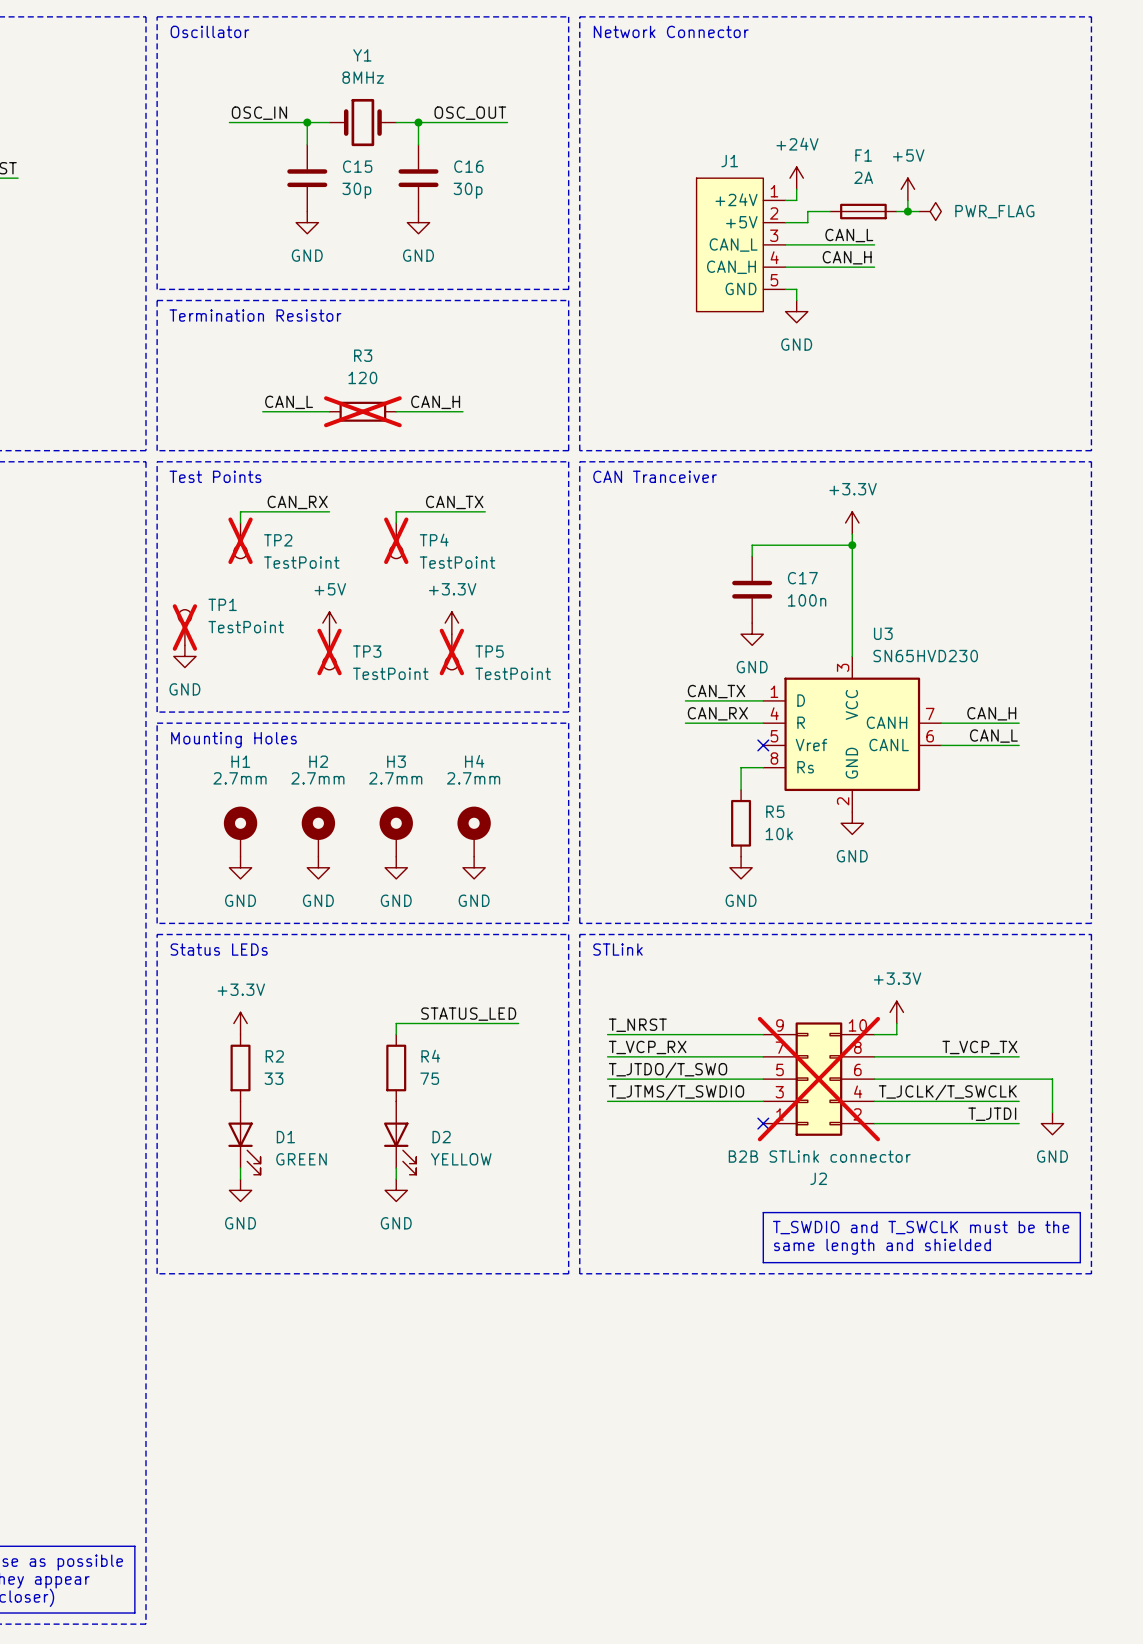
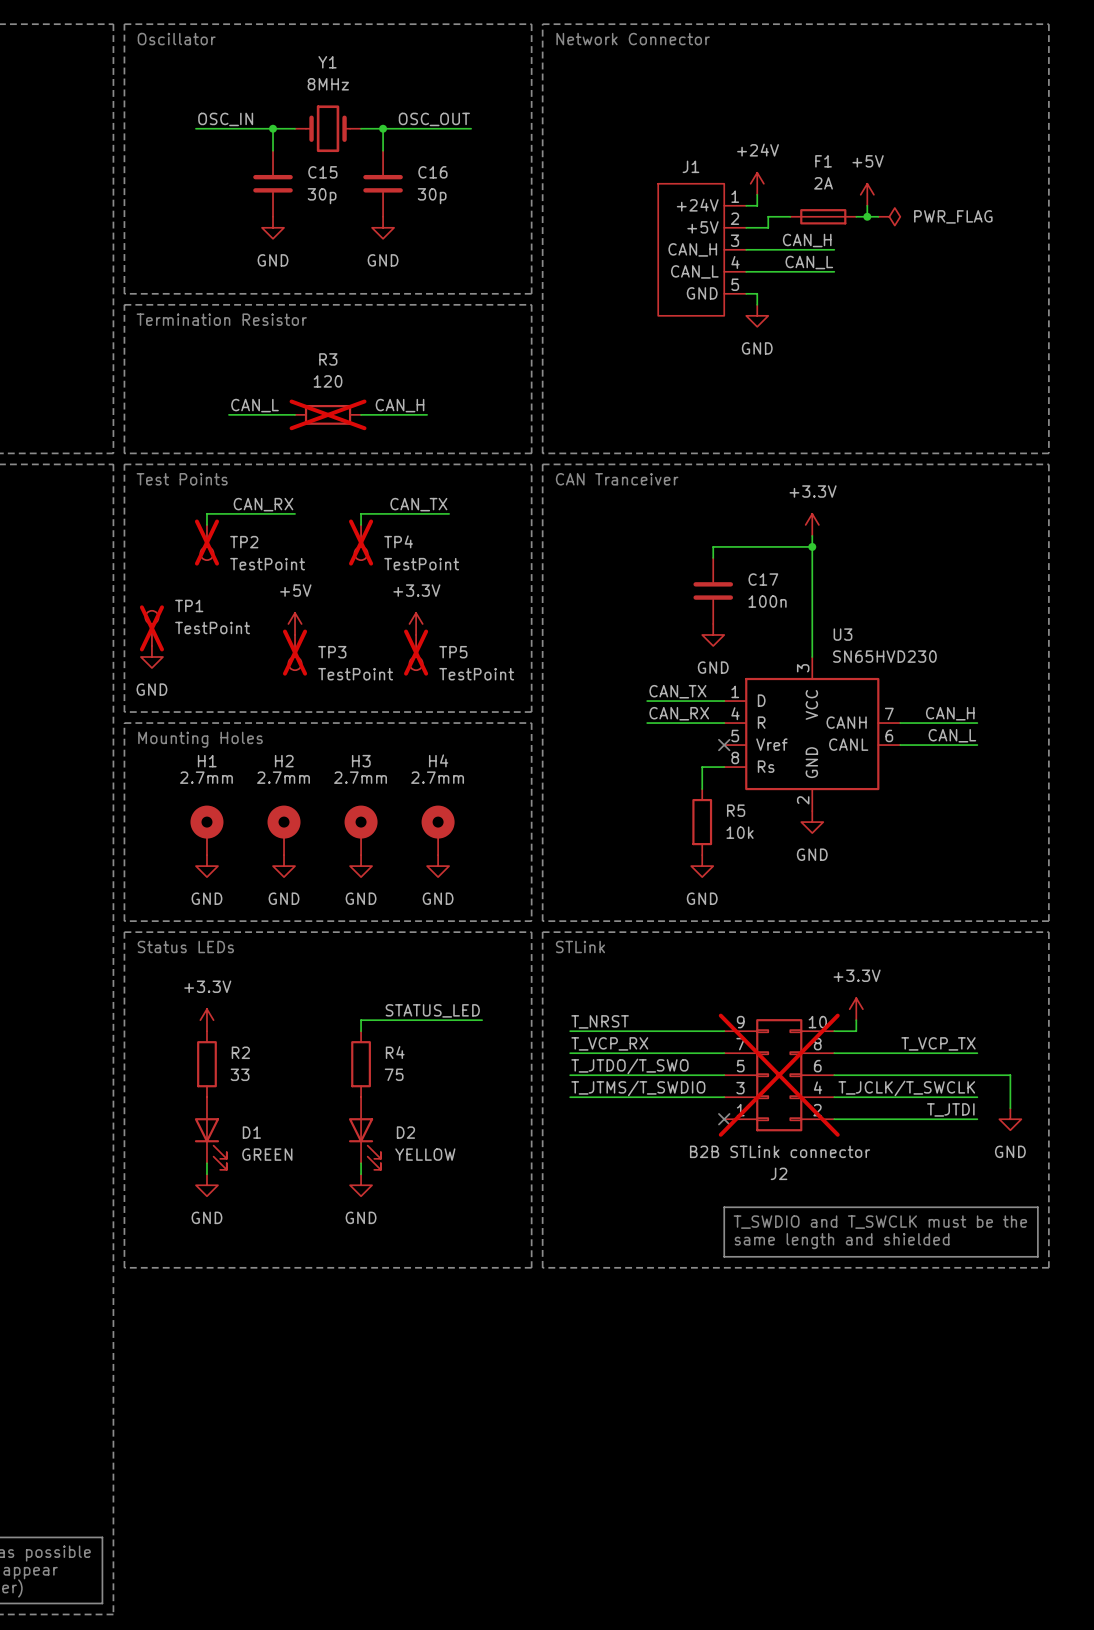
label: CAN_L (849, 235) -> CAN_H (807, 240)
J1 pin name: CAN_L (733, 245) -> CAN_H (692, 249)
label: CAN_H (847, 257) -> CAN_L (809, 262)
J1 pin name: CAN_H (731, 267) -> CAN_L (694, 271)

